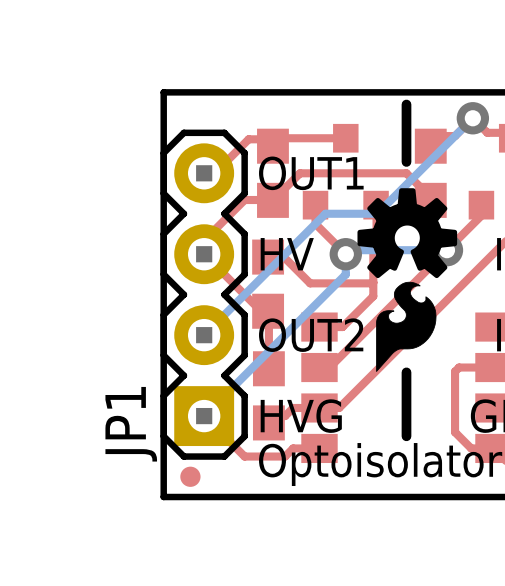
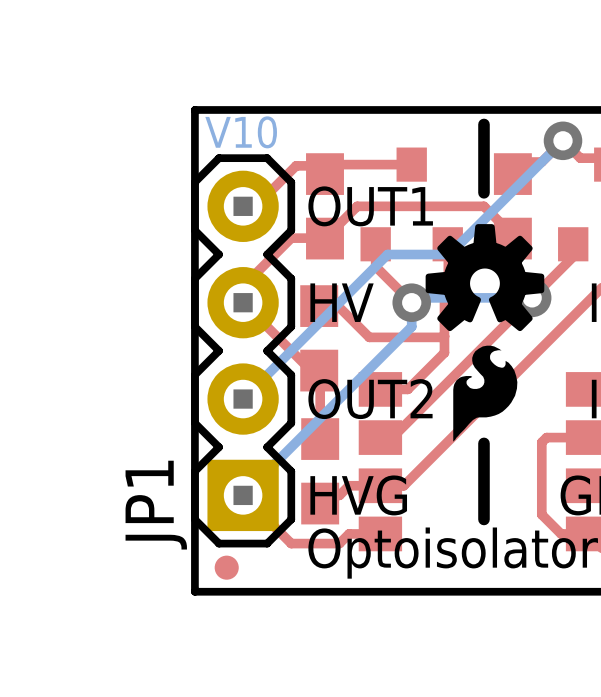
text: none -> V10 (241, 132)
drawing shape: [376, 281, 437, 372] -> [453, 345, 518, 443]

